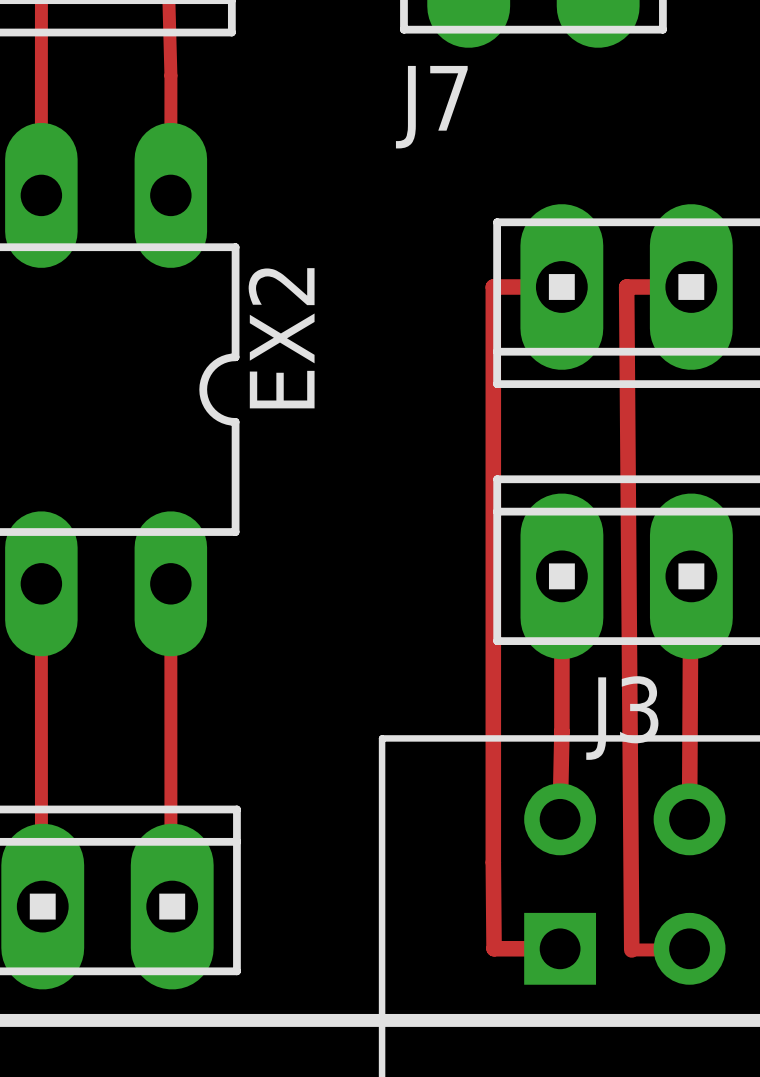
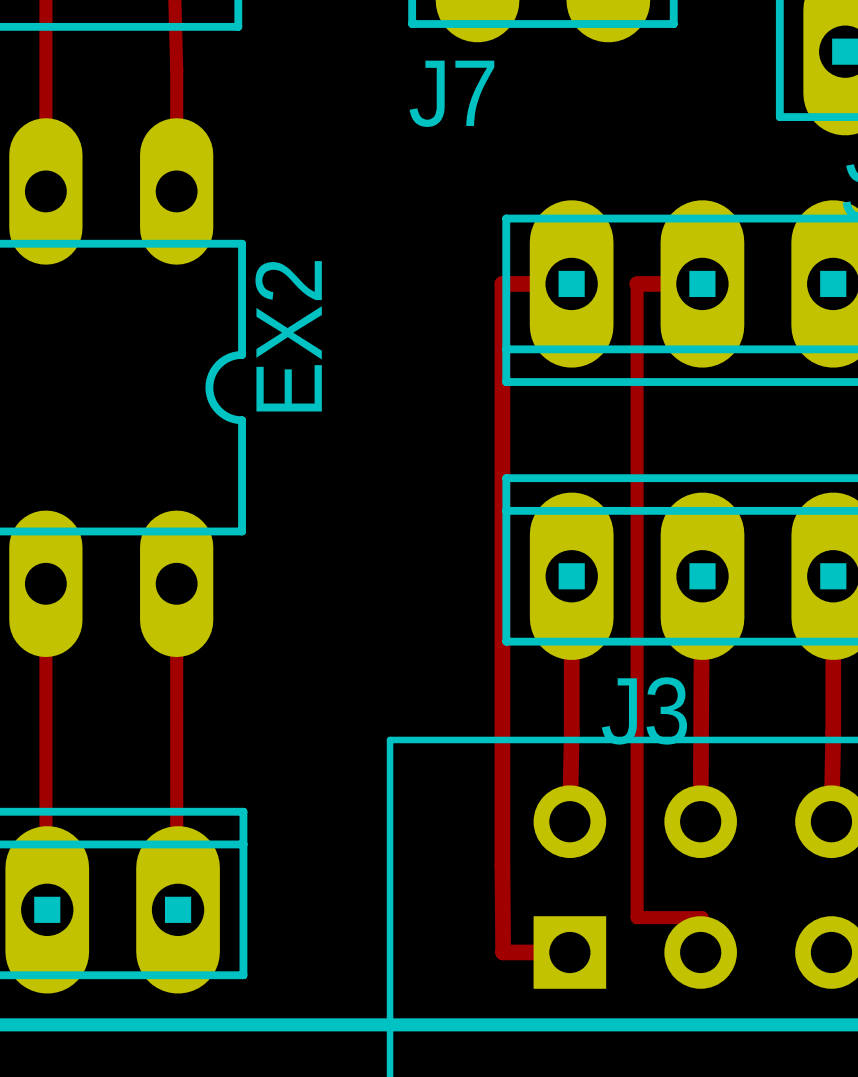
track: (626, 286) (631, 949) (690, 949) (689, 948) -> (637, 283) (637, 917) (701, 917) (700, 952)

